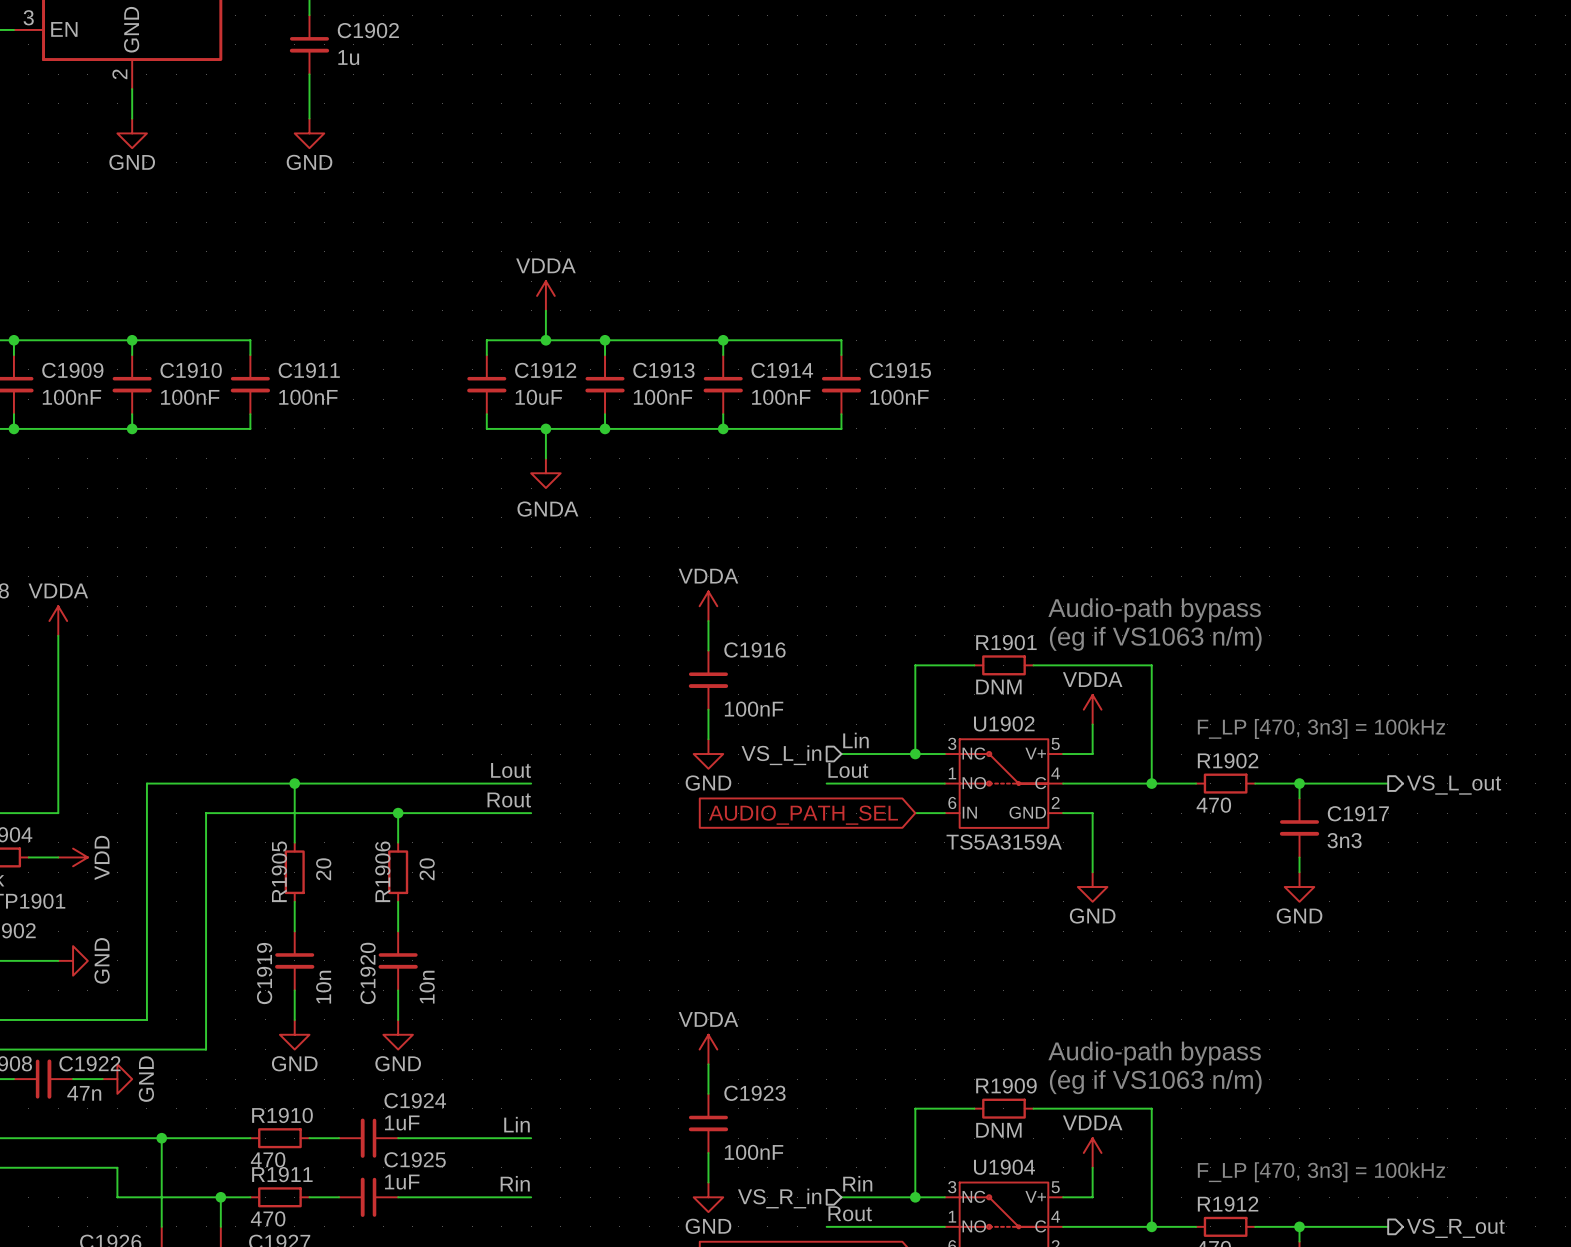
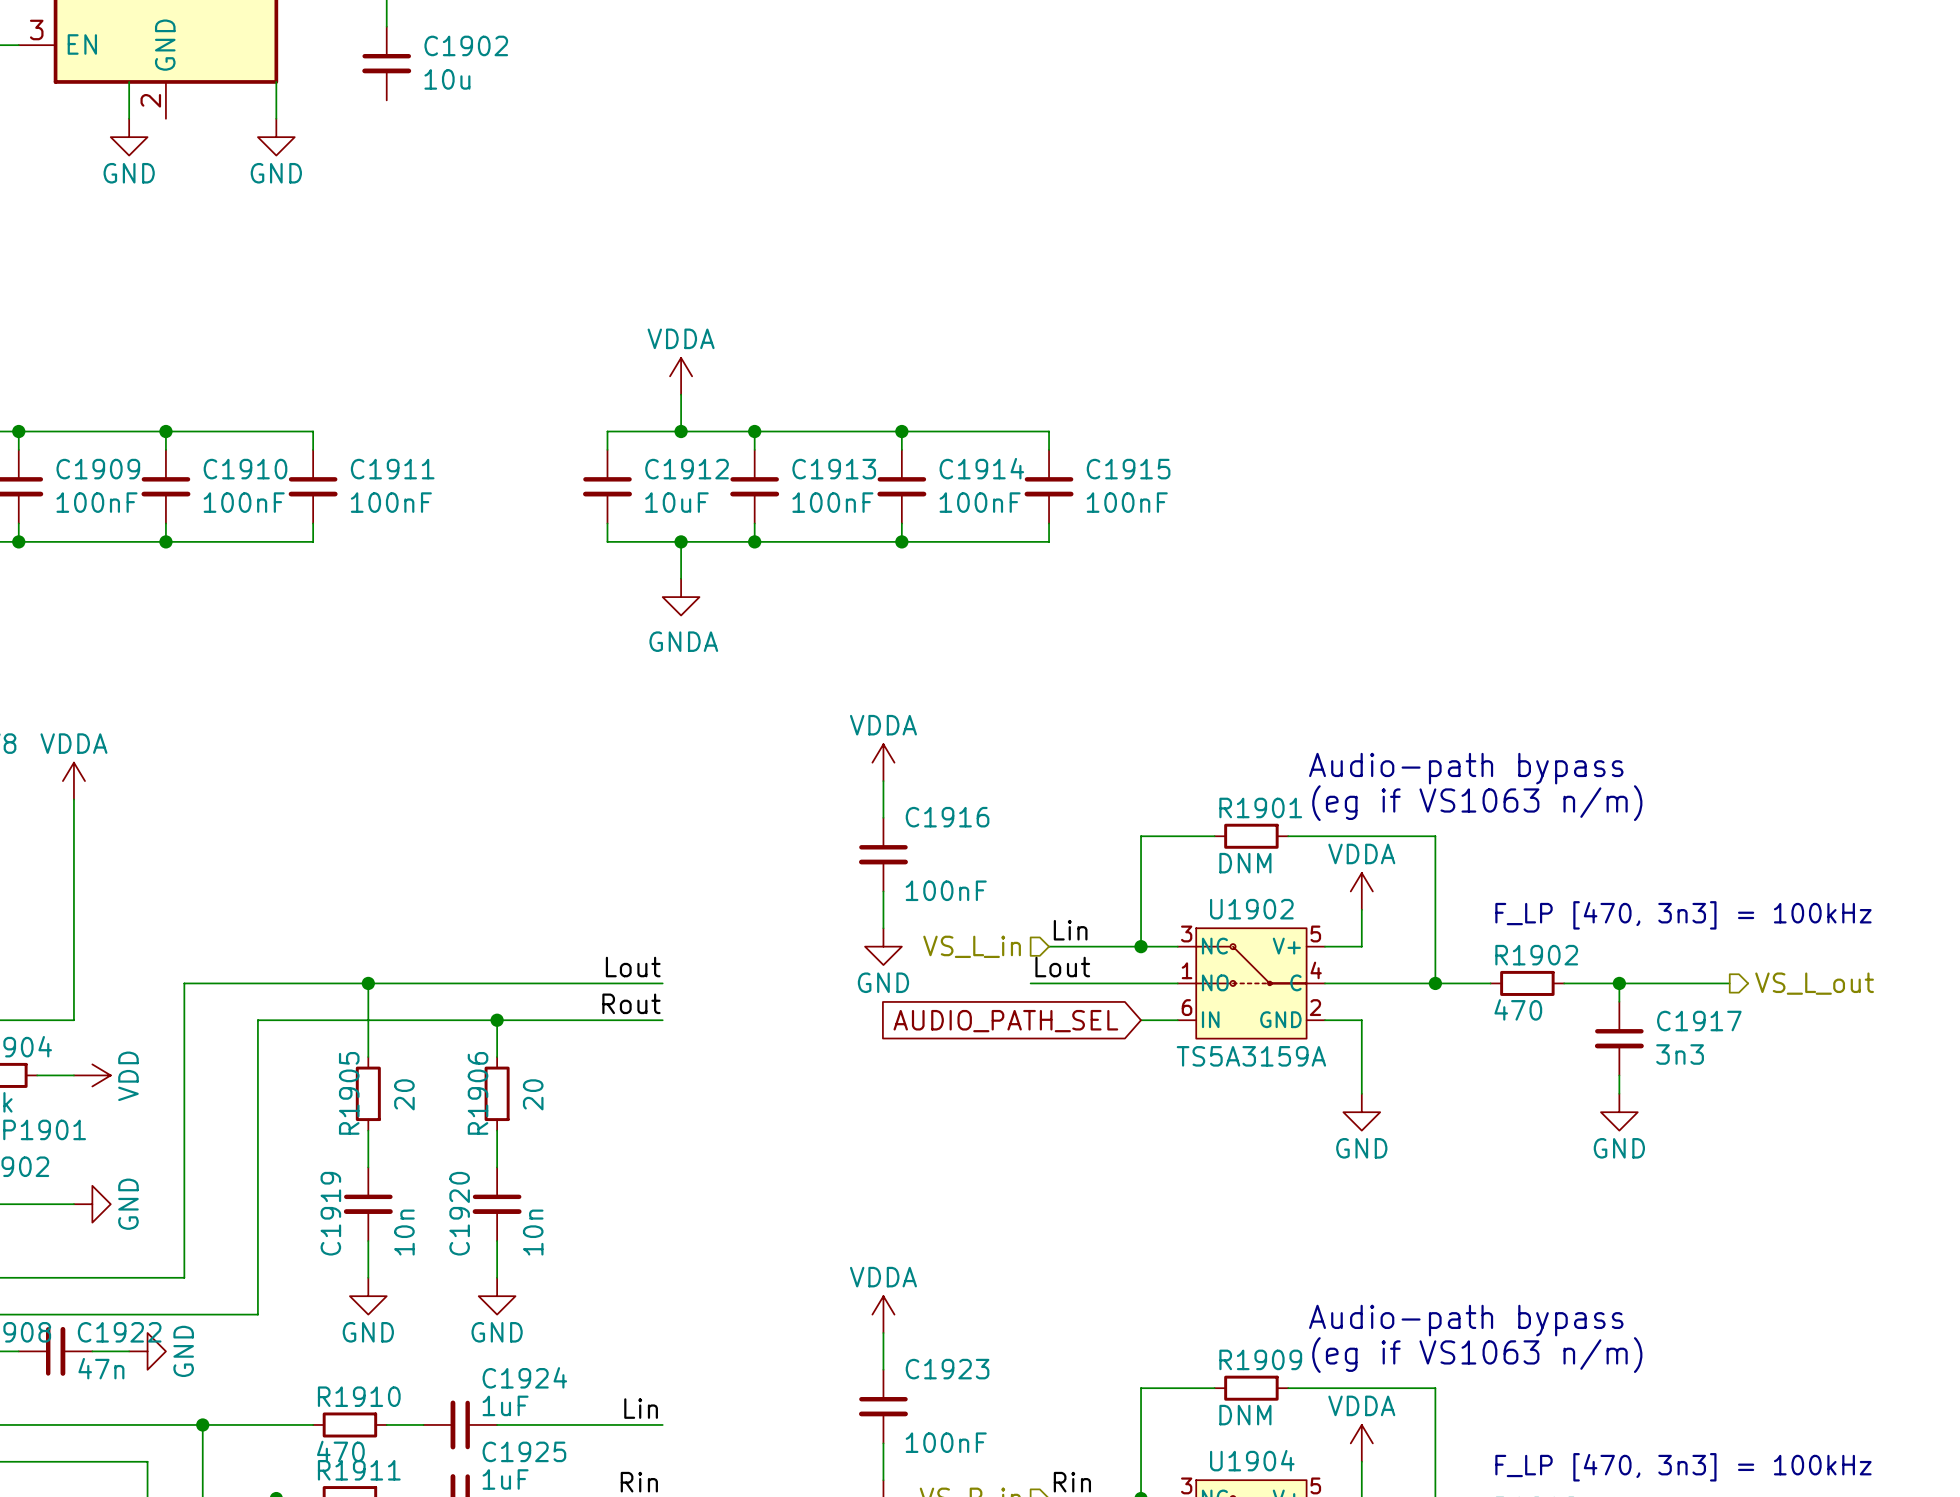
C1902 value: 1u (348, 57) -> 10u (447, 79)
wire: none -> (276, 81) (276, 118)
wire: (309, 74) (309, 118) -> none
wire: (132, 89) (132, 118) -> (129, 81) (129, 118)
power symbol: none -> GND (276, 137)
power symbol position: GND (132, 133) -> GND (129, 137)
power symbol: GND (309, 133) -> none

